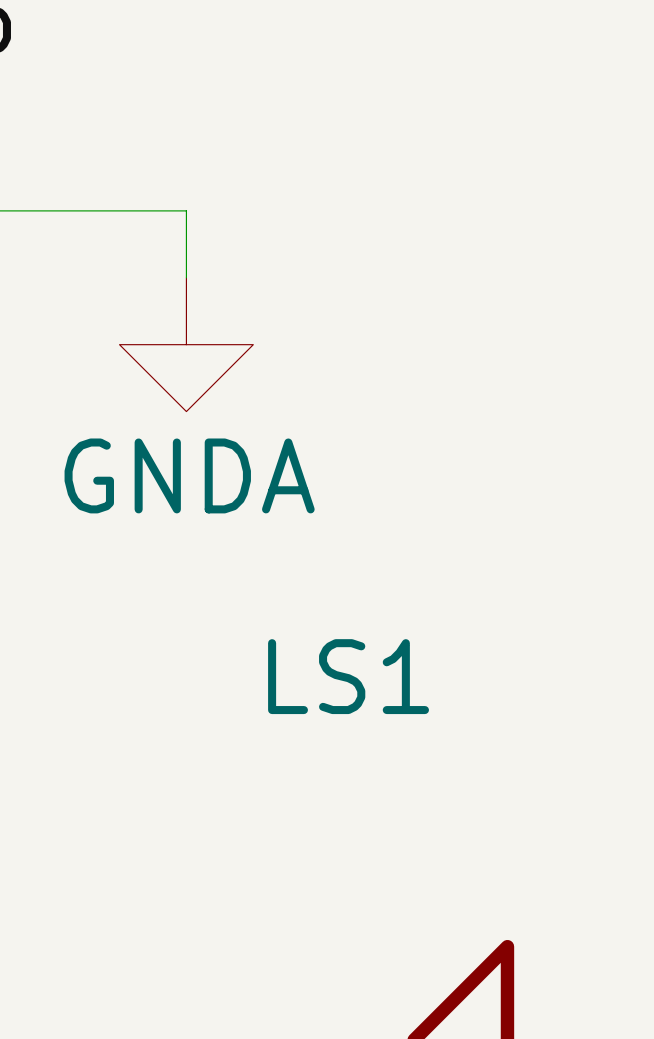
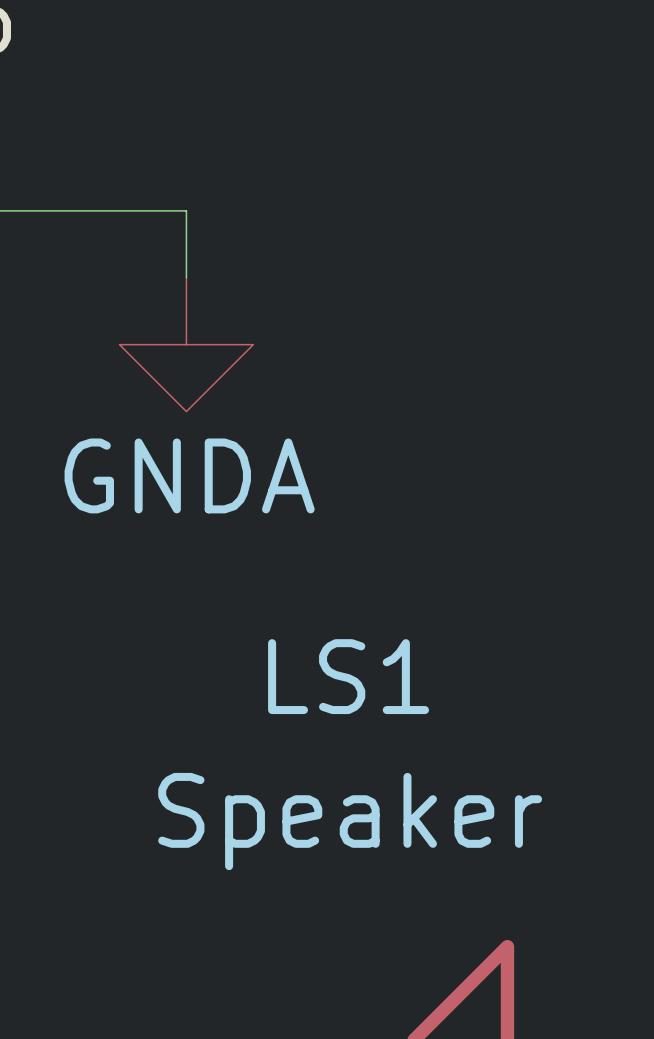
LS1 value: none -> Speaker (350, 821)

